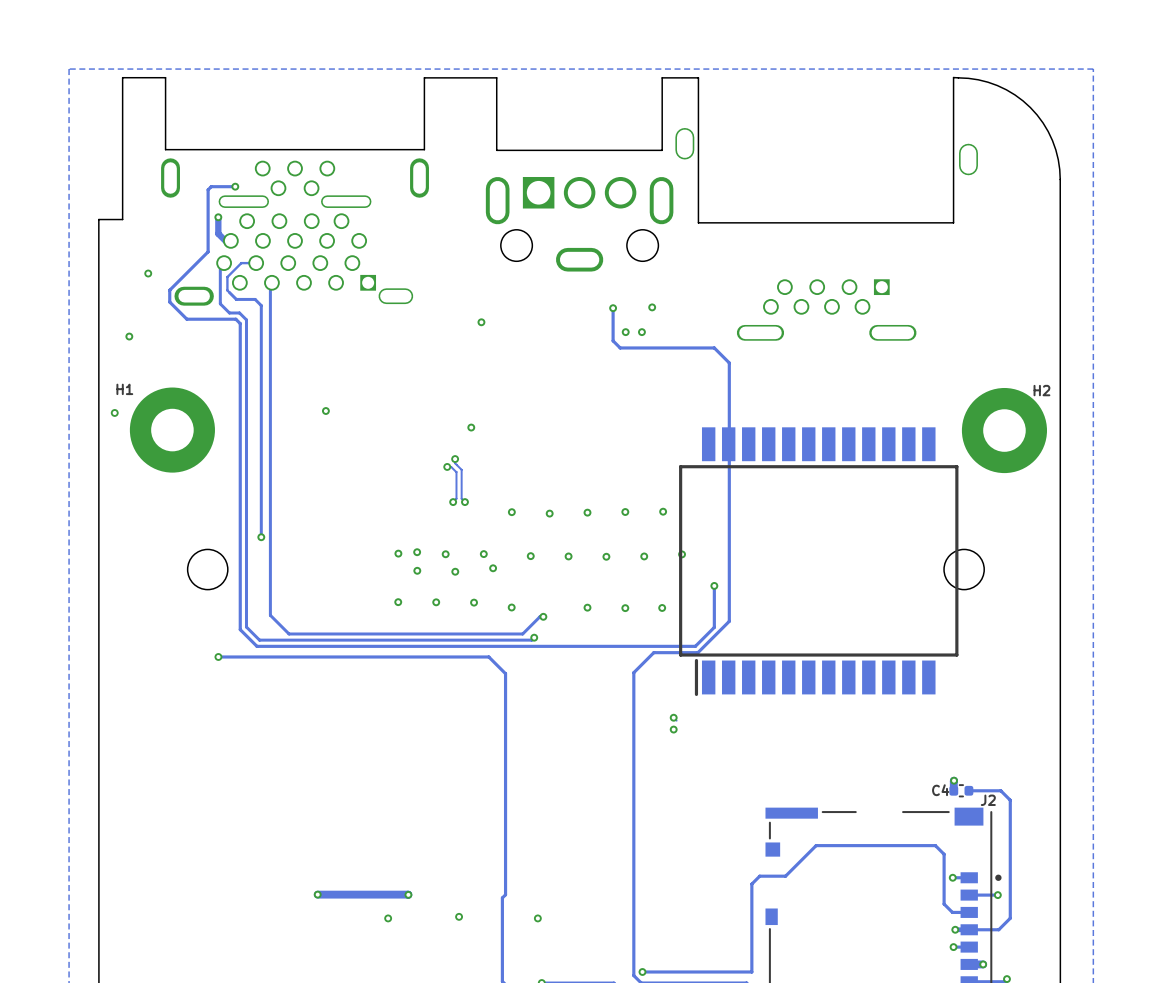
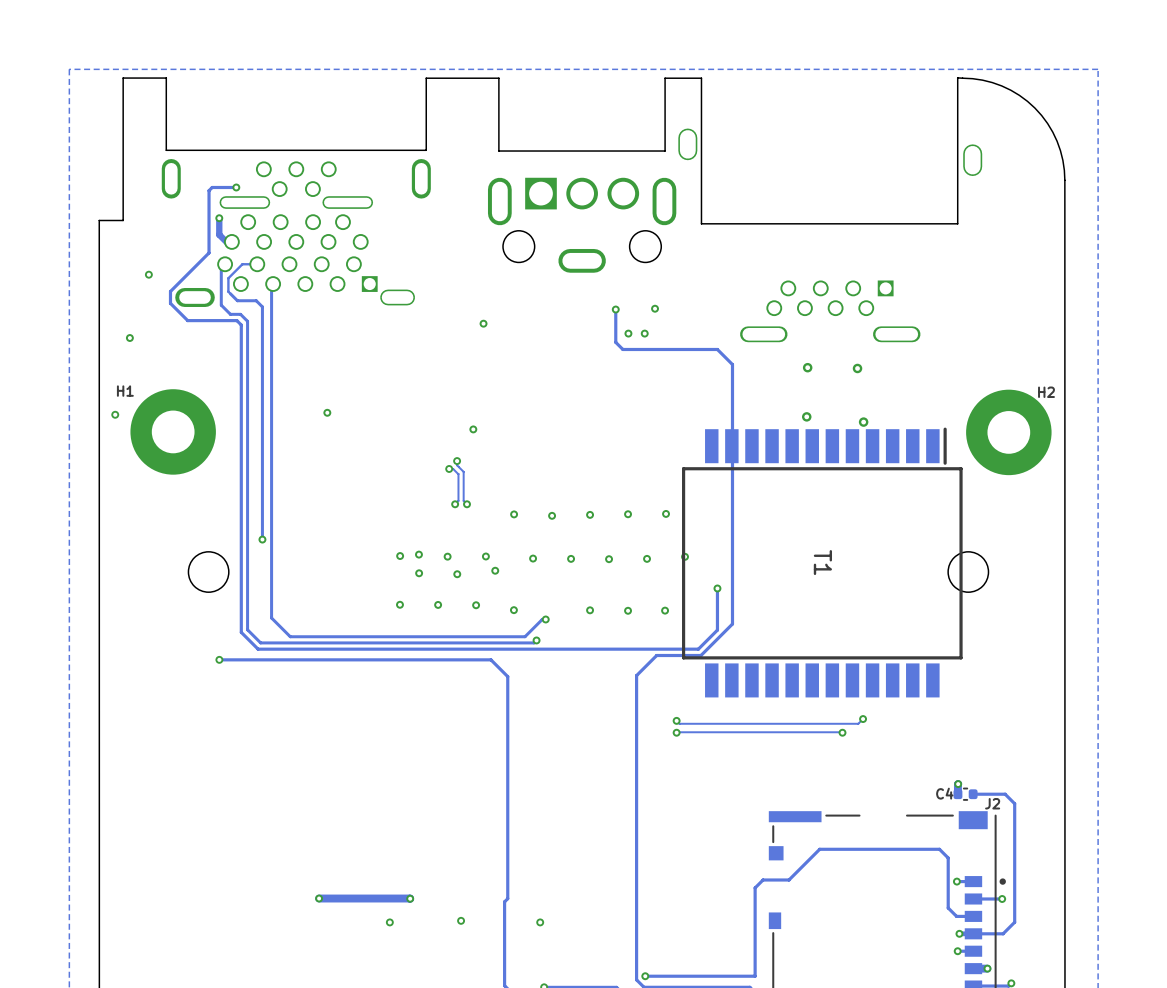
via: none -> (807, 367)
via: none -> (857, 368)
via: none -> (806, 416)
via: none -> (863, 422)
T1: none -> (822, 562)
part: (818, 561) -> none
track: none -> (863, 719) (858, 723) (679, 723)
via: none -> (863, 719)
track: none -> (677, 732) (842, 732)
via: none -> (842, 732)

